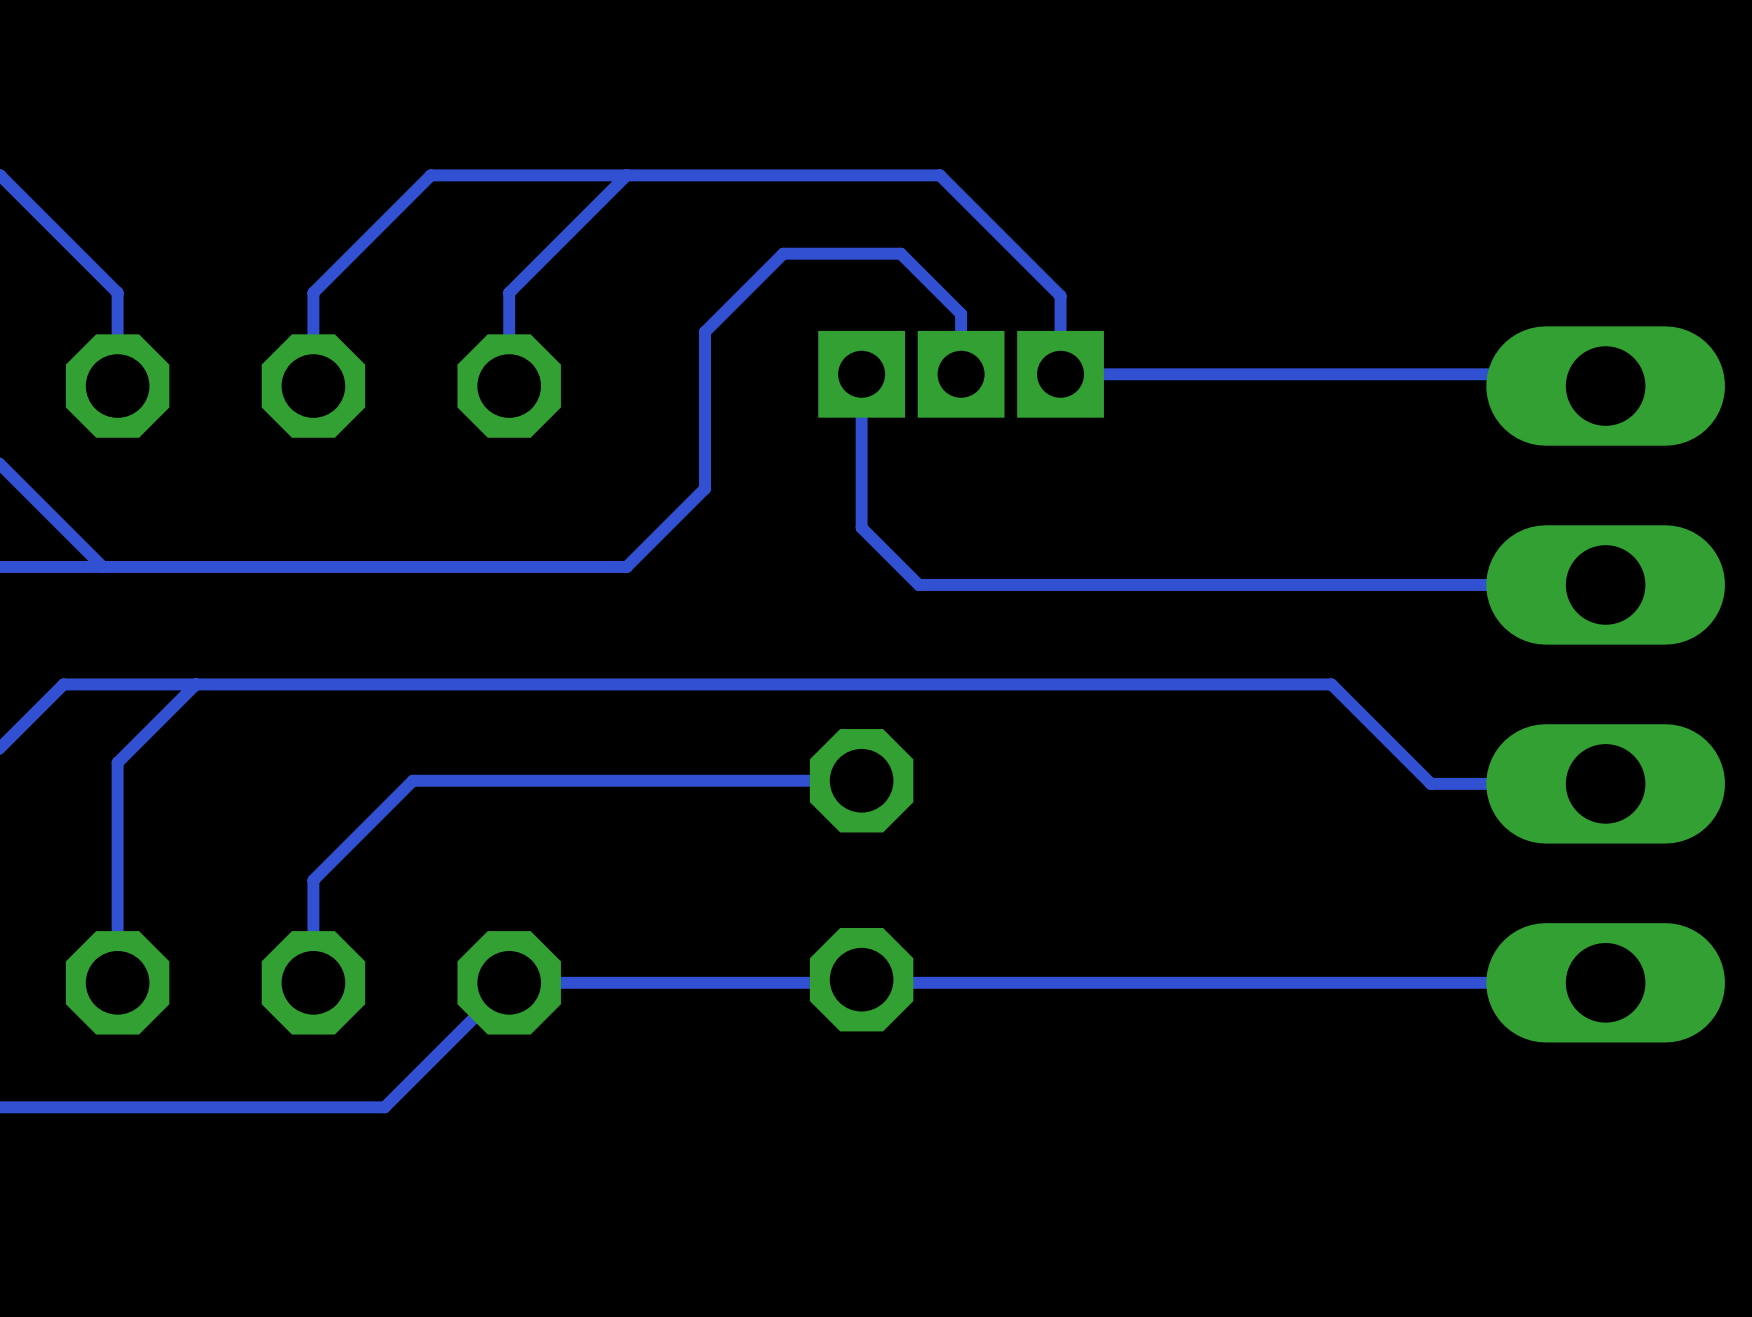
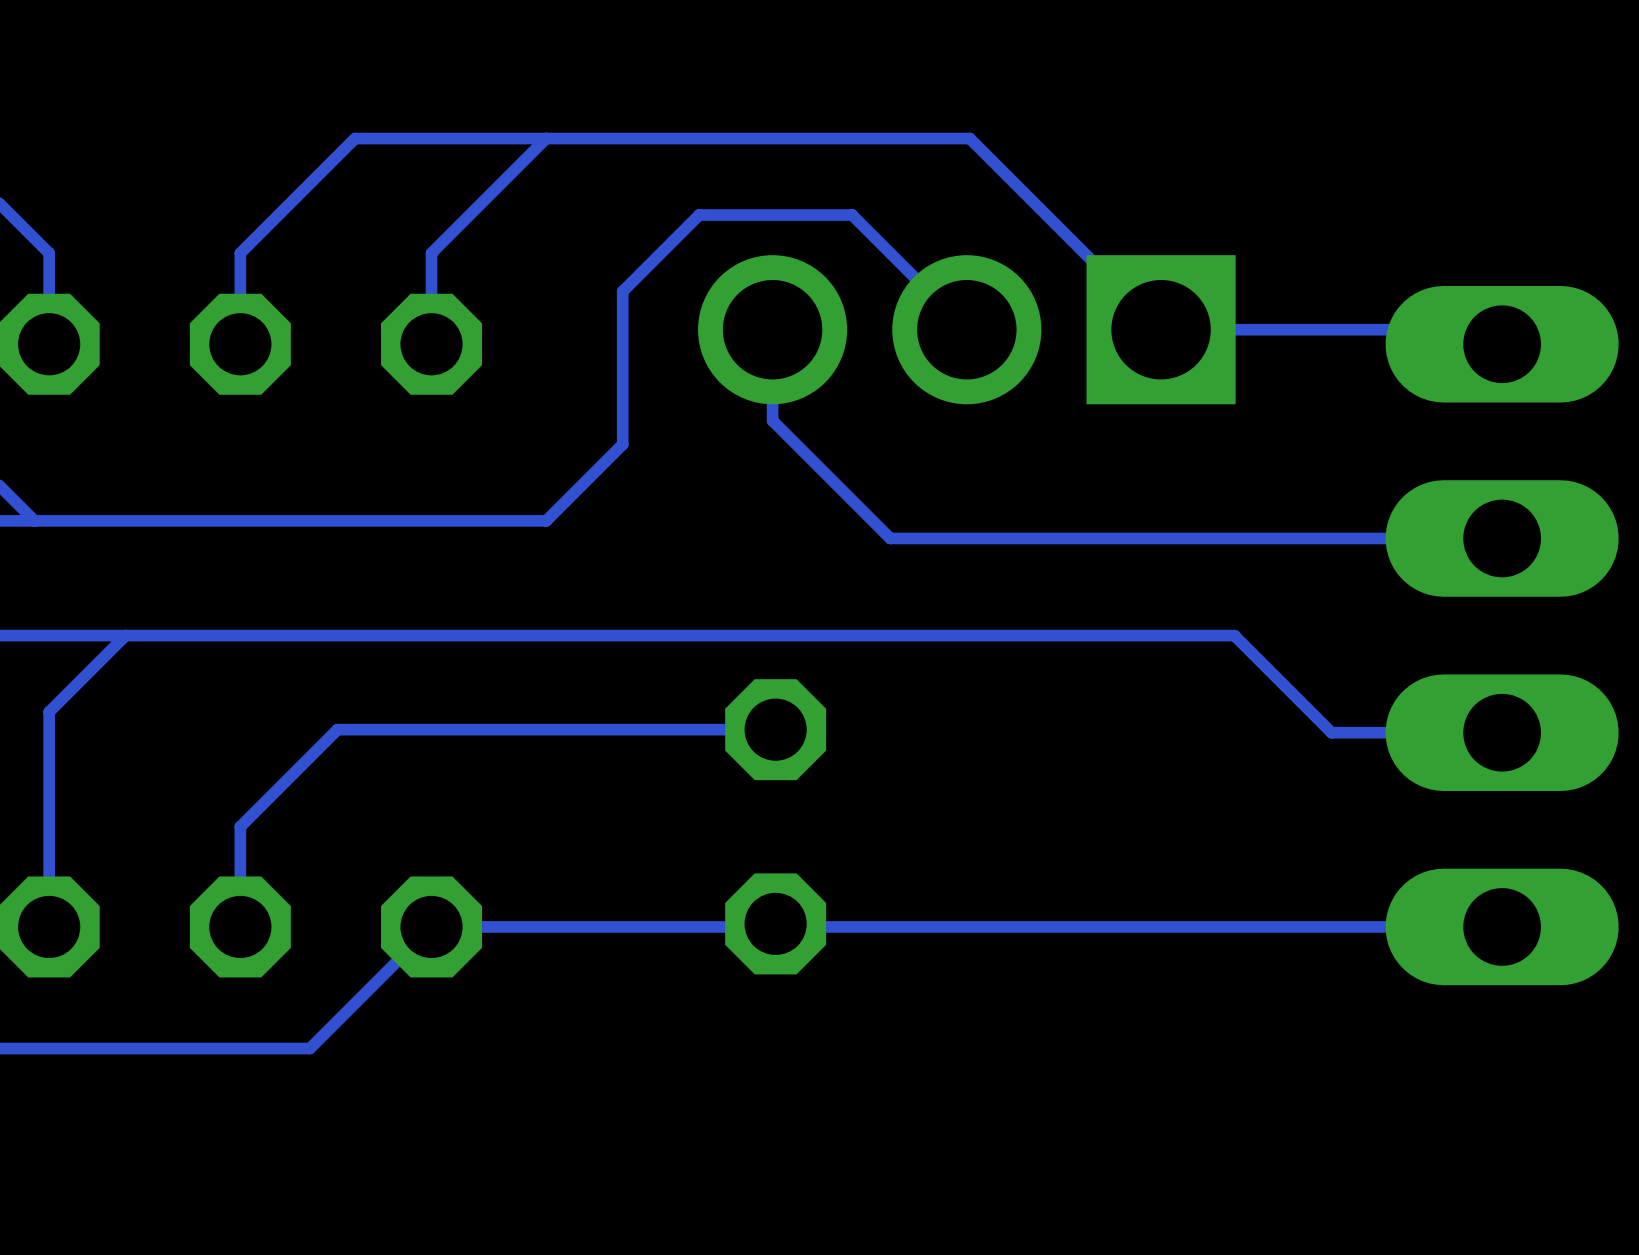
bottom track: (939, 175) (1060, 295) (1060, 374) (1593, 374) -> (852, 138) (969, 138) (1161, 329) (1487, 329) (1490, 332)
bottom track: (900, 253) (961, 313) (961, 374) -> (813, 215) (852, 215) (966, 329)
part: none -> (966, 329)
bottom track: (861, 374) (861, 527) (918, 584) (979, 584) -> (772, 329) (772, 420) (890, 538)
part: (961, 374) -> none

